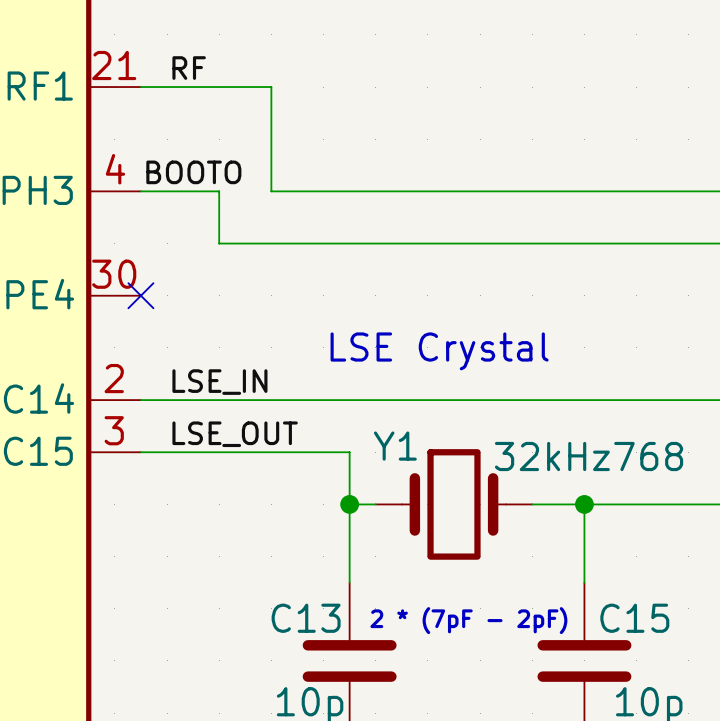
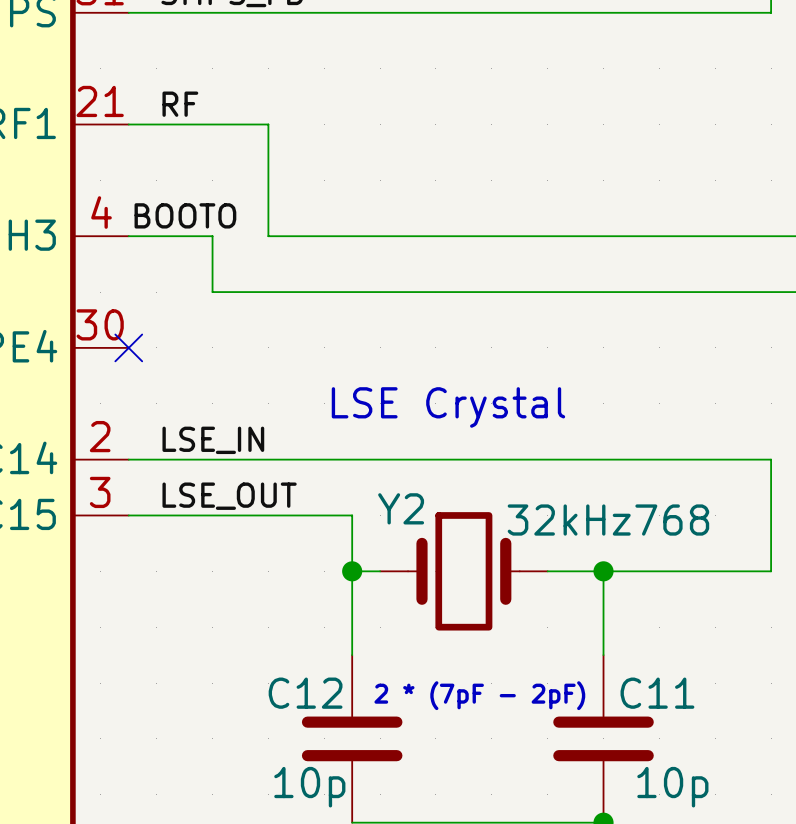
Y1 name: Y1 (395, 446) -> Y2 (401, 508)
C13 name: C13 (306, 618) -> C12 (305, 693)
C15 name: C15 (634, 618) -> C11 (657, 693)

